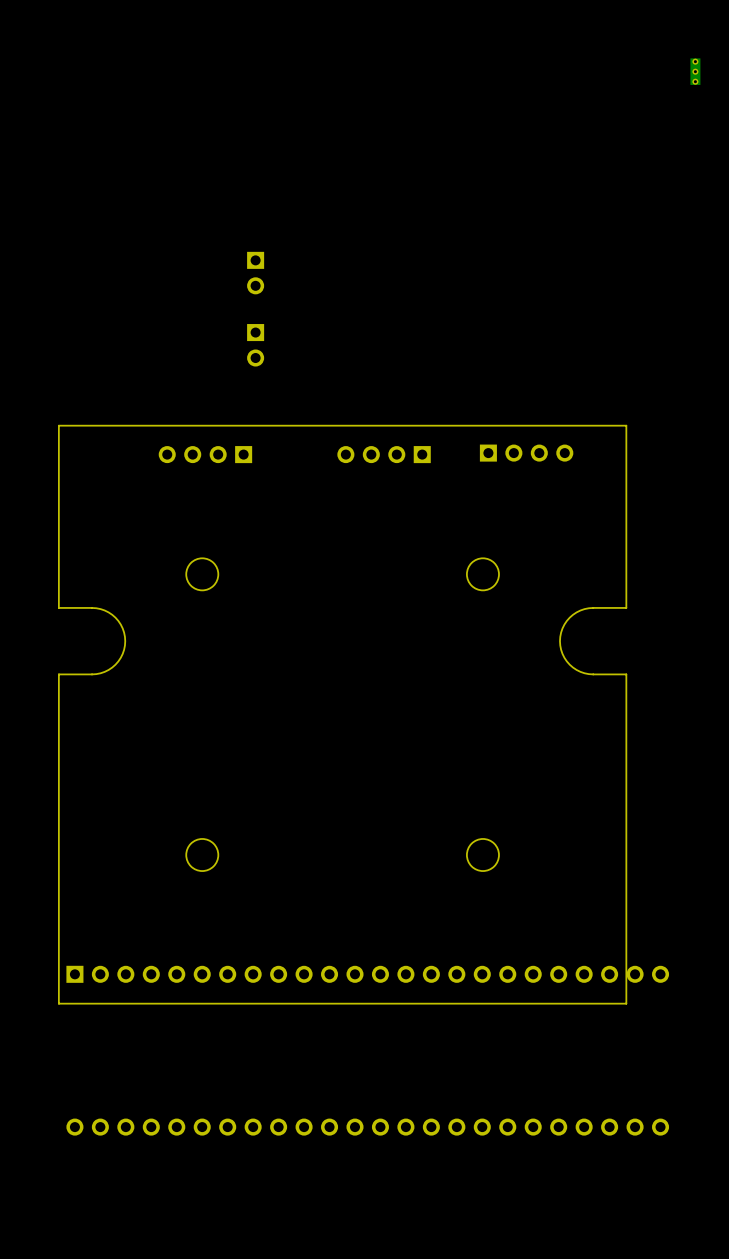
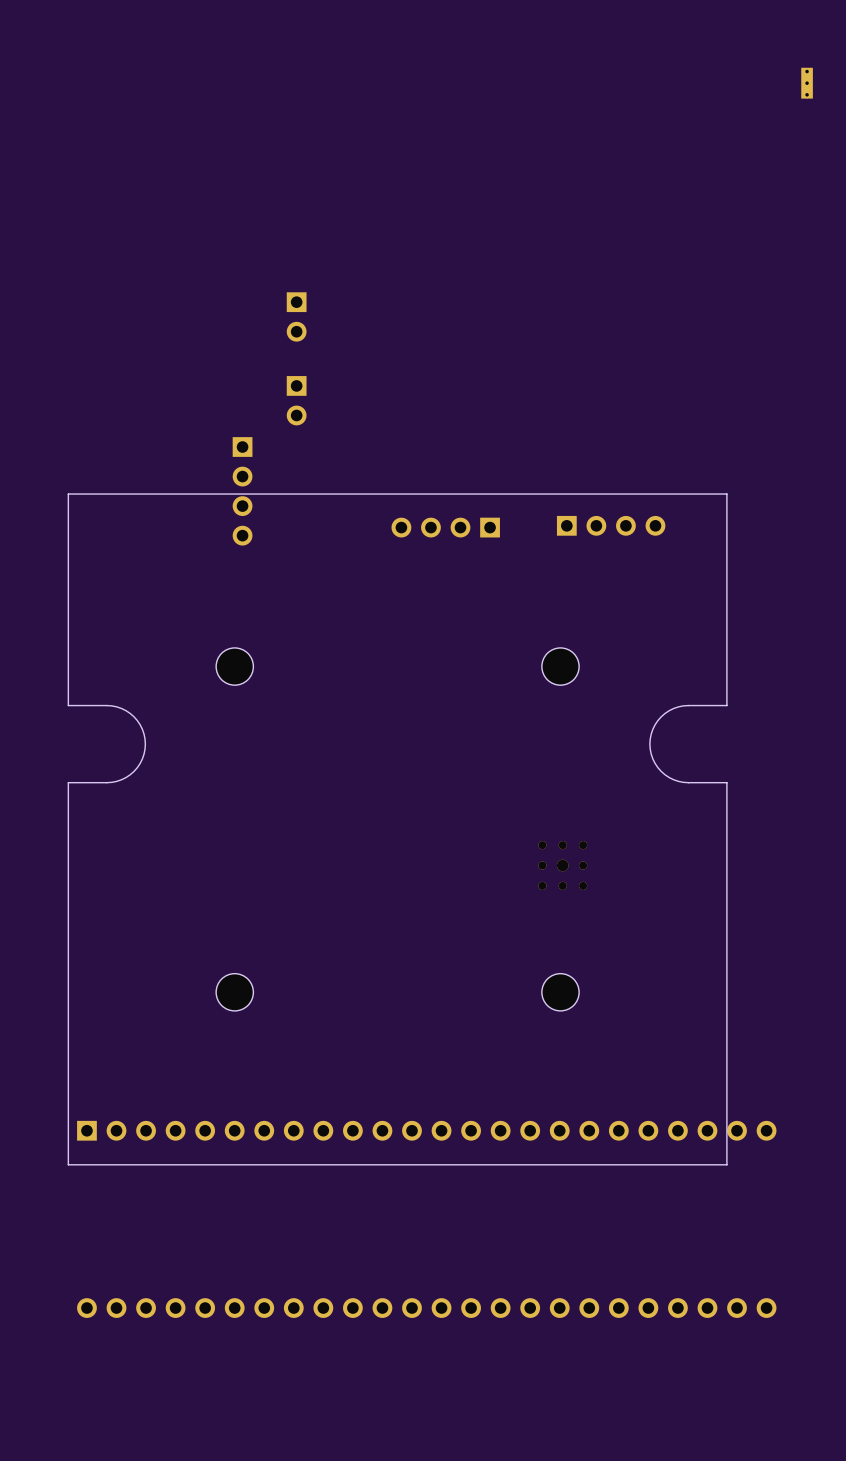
part rotation: 0° (205, 454) -> 90° counterclockwise (242, 491)
part: none -> (562, 865)

